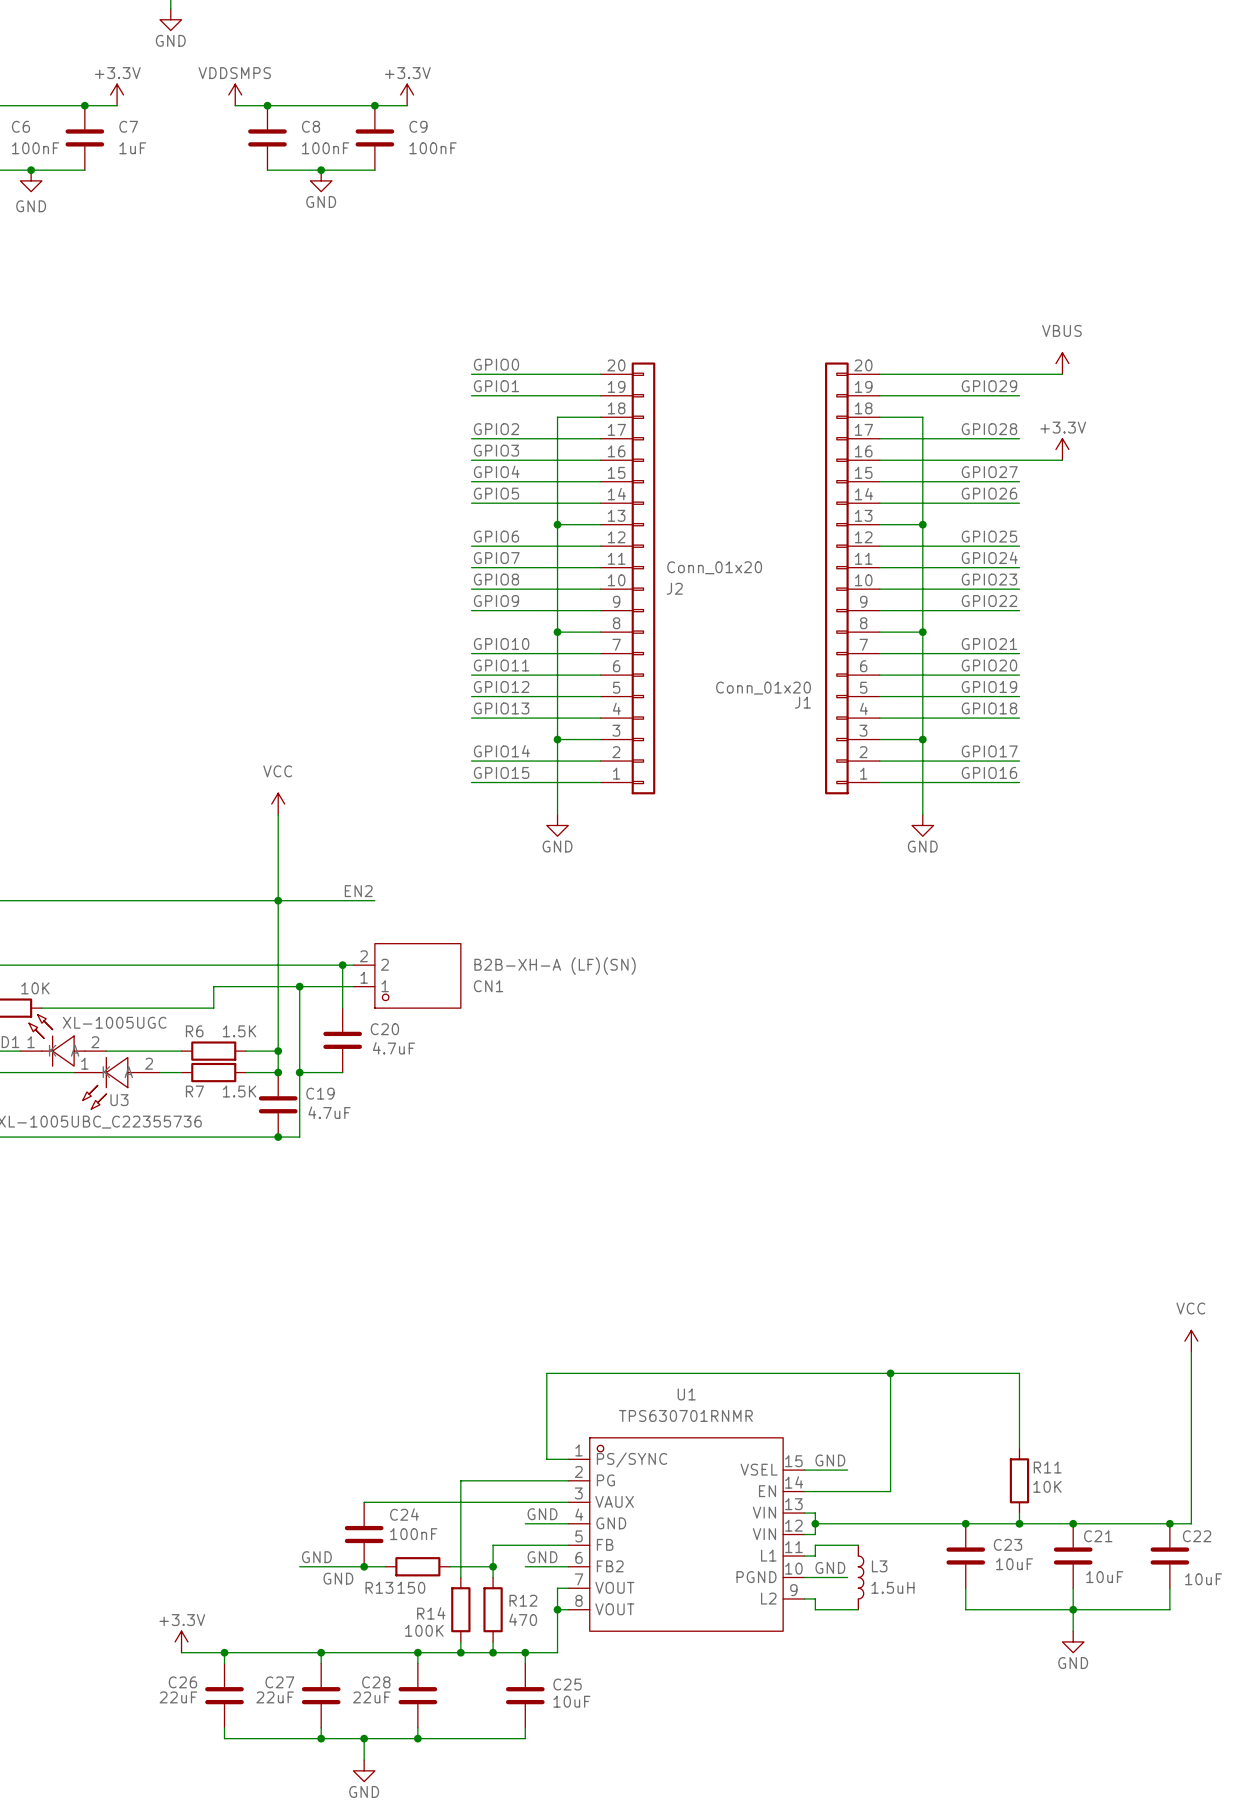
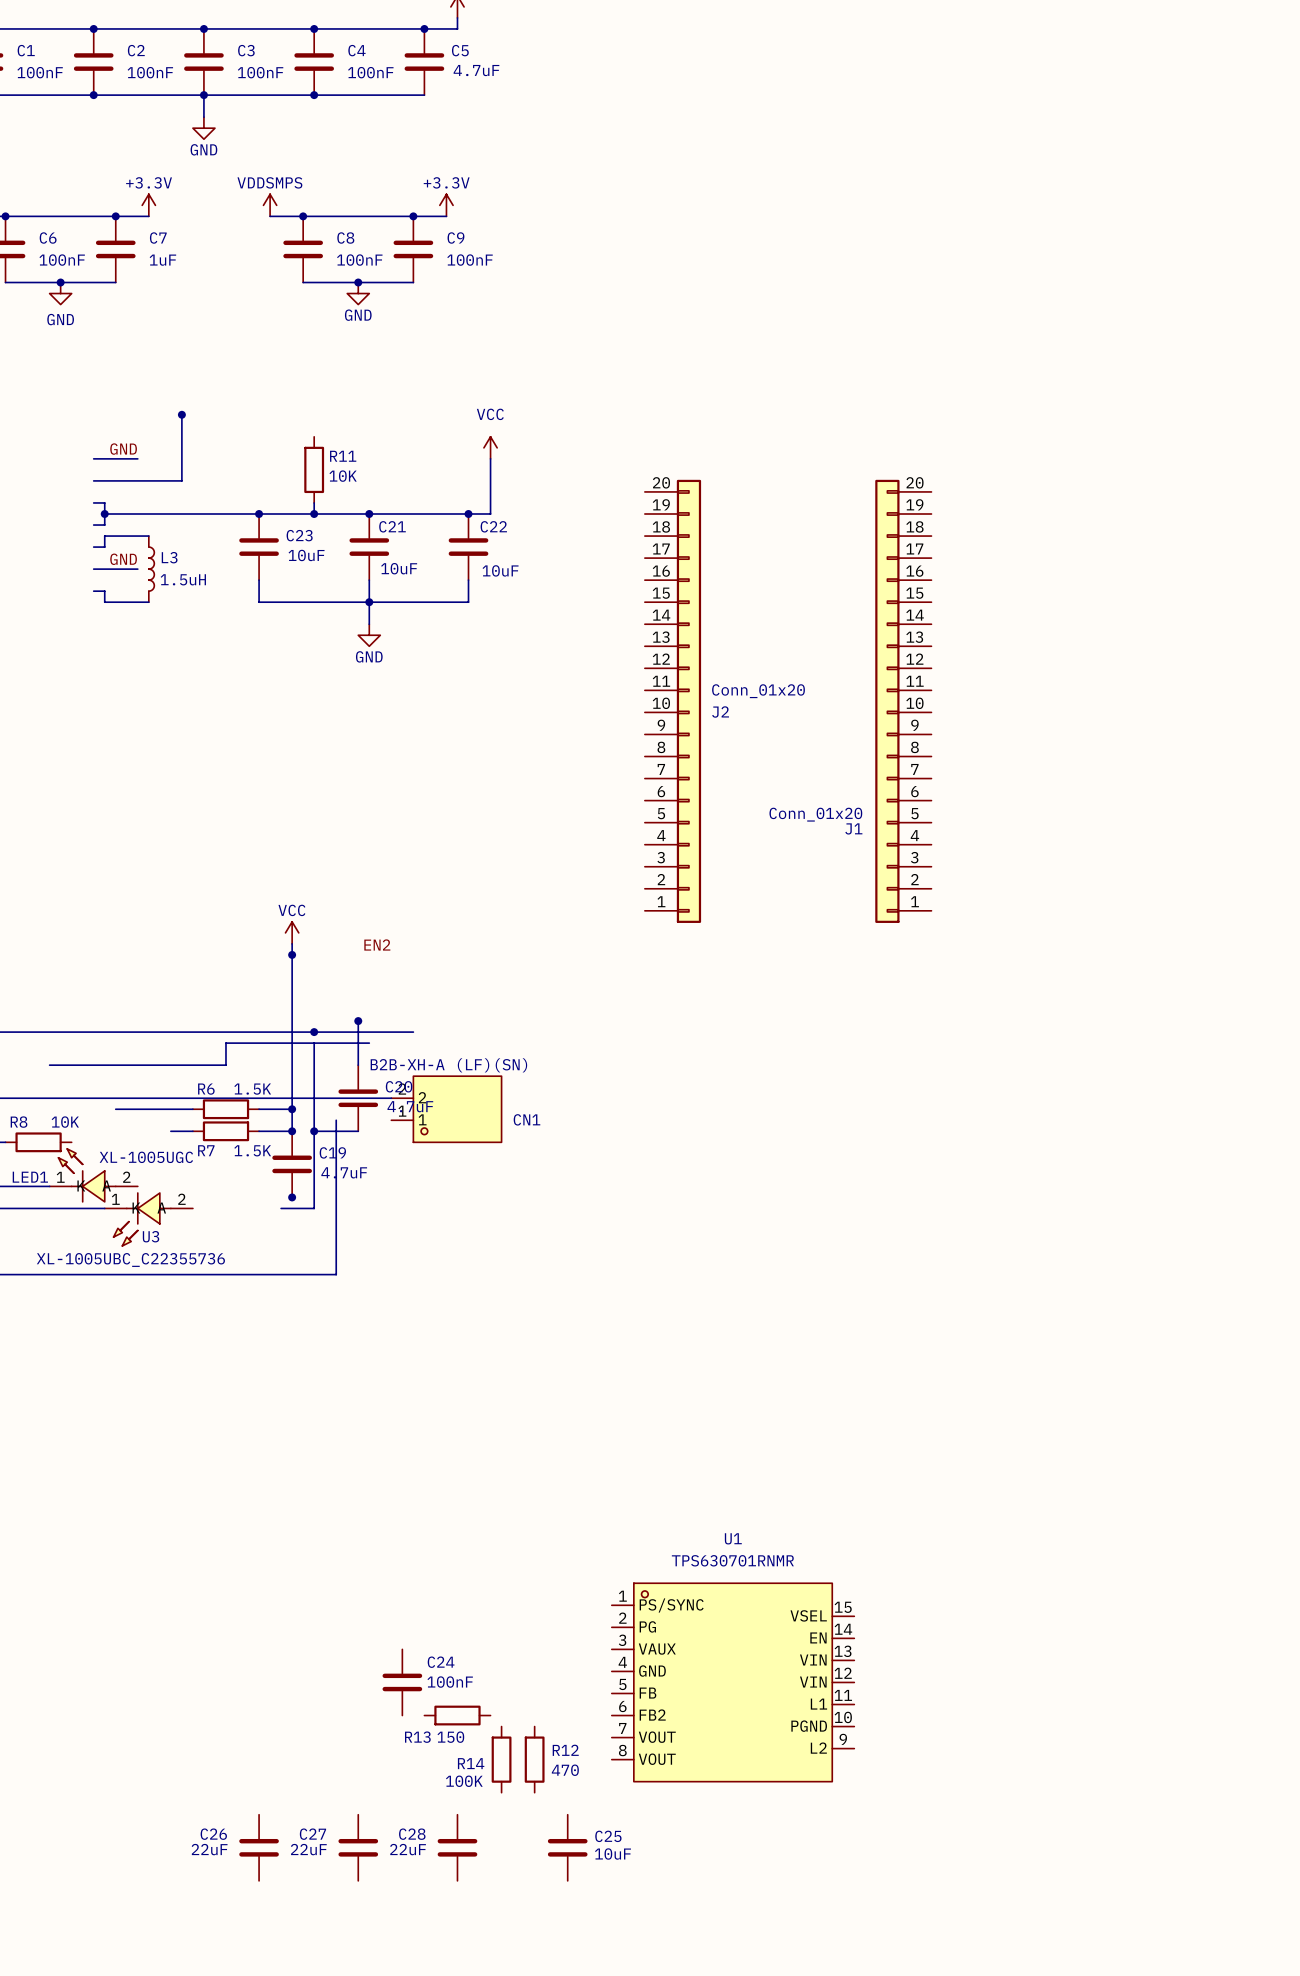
wire: none -> (181, 414) (181, 480) (93, 480)
junction: none -> (181, 414)
power symbol: none -> VCC (490, 447)
label: none -> GND (123, 449)
wire: none -> (93, 458) (137, 458)
wire: none -> (490, 458) (490, 514) (104, 514)
power symbol: VBUS (1062, 363) -> none
label: GPIO0 (496, 364) -> none
wire: (471, 374) (600, 374) -> none
wire: (879, 374) (1062, 374) -> none
wire: none -> (93, 502) (104, 502) (104, 525) (93, 525)
wire: none -> (314, 502) (314, 514)
label: GPIO1 (496, 386) -> none
label: GPIO29 (989, 386) -> none
junction: none -> (104, 514)
junction: none -> (259, 514)
junction: none -> (314, 514)
junction: none -> (369, 514)
junction: none -> (468, 514)
wire: (471, 395) (600, 395) -> none
wire: (879, 395) (1019, 395) -> none
wire: none -> (148, 536) (104, 536) (104, 547) (93, 547)
wire: (600, 417) (557, 417) (557, 814) -> none
wire: (879, 417) (922, 417) (922, 814) -> none
label: GPIO2 (496, 429) -> none
label: GPIO28 (989, 429) -> none
wire: (471, 438) (600, 438) -> none
wire: (879, 438) (1019, 438) -> none
label: none -> GND (123, 559)
wire: none -> (93, 569) (137, 569)
power symbol: +3.3V (1062, 449) -> none
label: GPIO3 (496, 450) -> none
wire: none -> (259, 580) (259, 602) (468, 602) (468, 580)
wire: none -> (369, 580) (369, 624)
wire: (471, 460) (600, 460) -> none
wire: (879, 460) (1062, 460) -> none
wire: none -> (93, 591) (104, 591) (104, 602) (148, 602)
label: GPIO4 (496, 471) -> none
label: GPIO27 (989, 472) -> none
junction: none -> (369, 602)
wire: (471, 481) (600, 481) -> none
wire: (879, 481) (1019, 481) -> none
label: GPIO5 (496, 493) -> none
label: GPIO26 (989, 493) -> none
wire: (471, 503) (600, 503) -> none
wire: (879, 503) (1019, 503) -> none
power symbol: none -> GND (369, 635)
wire: (557, 524) (600, 524) -> none
junction: (557, 524) -> none
wire: (879, 524) (922, 524) -> none
junction: (922, 524) -> none
label: GPIO6 (496, 536) -> none
label: GPIO25 (989, 536) -> none
wire: (471, 546) (600, 546) -> none
wire: (879, 546) (1019, 546) -> none
label: GPIO24 (989, 557) -> none
label: GPIO7 (496, 558) -> none
wire: (471, 567) (600, 567) -> none
wire: (879, 567) (1019, 567) -> none
label: GPIO8 (496, 579) -> none
label: GPIO23 (989, 579) -> none
wire: (471, 589) (600, 589) -> none
wire: (879, 589) (1019, 589) -> none
label: GPIO9 (496, 601) -> none
label: GPIO22 (989, 601) -> none
wire: (471, 610) (600, 610) -> none
wire: (879, 610) (1019, 610) -> none
wire: (557, 632) (600, 632) -> none
junction: (557, 632) -> none
wire: (879, 632) (922, 632) -> none
junction: (922, 632) -> none
label: GPIO10 (501, 644) -> none
label: GPIO21 (989, 644) -> none
wire: (471, 653) (600, 653) -> none
wire: (879, 653) (1019, 653) -> none
label: GPIO11 (501, 665) -> none
label: GPIO20 (989, 665) -> none
wire: (471, 675) (600, 675) -> none
wire: (879, 675) (1019, 675) -> none
label: GPIO12 (501, 686) -> none
label: GPIO19 (989, 686) -> none
wire: (471, 696) (600, 696) -> none
wire: (879, 696) (1019, 696) -> none
label: GPIO13 (501, 708) -> none
label: GPIO18 (989, 708) -> none
wire: (471, 718) (600, 718) -> none
wire: (879, 718) (1019, 718) -> none
wire: (557, 739) (600, 739) -> none
junction: (557, 739) -> none
wire: (879, 739) (922, 739) -> none
junction: (922, 739) -> none
label: GPIO14 (501, 751) -> none
label: GPIO17 (989, 751) -> none
wire: (471, 761) (600, 761) -> none
wire: (879, 761) (1019, 761) -> none
power symbol text position: VCC (277, 771) -> VCC (291, 910)
label: GPIO15 (501, 772) -> none
label: GPIO16 (989, 772) -> none
wire: (471, 782) (600, 782) -> none
wire: (879, 782) (1019, 782) -> none
power symbol position: VCC (278, 804) -> VCC (292, 932)
wire: none -> (292, 943) (292, 1131) (259, 1131)
wire: (278, 814) (278, 911) -> none
junction: none -> (292, 954)
power symbol: GND (557, 825) -> none
power symbol: GND (922, 825) -> none
junction: none -> (358, 1021)
label position: EN2 (358, 891) -> EN2 (377, 944)
wire: (342, 965) (342, 1008) -> (358, 1021) (358, 1065)
junction: (342, 965) -> none
CN1 value position: B2B-XH-A (LF)(SN) (555, 966) -> B2B-XH-A (LF)(SN) (448, 1065)
junction: none -> (292, 1109)
junction: (299, 986) -> none
wire: (353, 986) (213, 986) (213, 1008) (41, 1008) -> (369, 1043) (225, 1043) (225, 1065) (49, 1065)
junction: none -> (292, 1131)
junction: none -> (314, 1131)
C20 position: (342, 1040) -> (358, 1098)
wire: (106, 1051) (181, 1051) -> (115, 1109) (192, 1109)
R6 position: (213, 1051) -> (225, 1109)
wire: (245, 1051) (278, 1051) -> (259, 1109) (292, 1109)
junction: (278, 1051) -> none
junction: none -> (292, 1197)
wire: (160, 1072) (181, 1072) -> (170, 1131) (192, 1131)
R7 position: (213, 1072) -> (225, 1131)
junction: (278, 1072) -> none
wire: (299, 1072) (342, 1072) -> (314, 1131) (358, 1131)
junction: (299, 1072) -> none
C19 position: (278, 1104) -> (292, 1164)
junction: (278, 1137) -> none
power symbol: VCC (1191, 1341) -> none
wire: (1191, 1351) (1191, 1523) (815, 1523) -> none
wire: (890, 1373) (890, 1491) (804, 1491) -> none
junction: (890, 1373) -> none
wire: (1019, 1448) (1019, 1373) (546, 1373) (546, 1459) (568, 1459) -> none
label: GND (830, 1460) -> none
wire: (804, 1470) (847, 1470) -> none
wire: (568, 1480) (460, 1480) (460, 1577) -> none
R11 position: (1019, 1480) -> (314, 469)
wire: (364, 1502) (568, 1502) -> none
wire: (804, 1513) (815, 1513) (815, 1534) (804, 1534) -> none
wire: (1019, 1513) (1019, 1523) -> none
label: GND (542, 1514) -> none
wire: (525, 1523) (568, 1523) -> none
junction: (815, 1523) -> none
junction: (965, 1523) -> none
junction: (1019, 1523) -> none
junction: (1073, 1523) -> none
junction: (1169, 1523) -> none
wire: (568, 1545) (493, 1545) (493, 1577) -> none
wire: (858, 1545) (815, 1545) (815, 1556) (804, 1556) -> none
C23 position: (965, 1556) -> (259, 547)
C21 position: (1073, 1556) -> (369, 547)
C22 position: (1169, 1556) -> (468, 547)
label: GND (316, 1557) -> none
label: GND (542, 1557) -> none
wire: (299, 1566) (385, 1566) -> none
junction: (364, 1566) -> none
wire: (450, 1566) (493, 1566) -> none
junction: (493, 1566) -> none
wire: (525, 1566) (568, 1566) -> none
label: GND (830, 1567) -> none
wire: (804, 1577) (847, 1577) -> none
L3 position: (861, 1577) -> (151, 569)
label: GND (338, 1578) -> none
wire: (568, 1588) (557, 1588) (557, 1652) (181, 1652) -> none
wire: (965, 1588) (965, 1609) (1169, 1609) (1169, 1588) -> none
wire: (1073, 1588) (1073, 1631) -> none
wire: (804, 1598) (815, 1598) (815, 1609) (858, 1609) -> none
wire: (557, 1609) (568, 1609) -> none
junction: (557, 1609) -> none
junction: (1073, 1609) -> none
power symbol: +3.3V (181, 1641) -> none
wire: (460, 1641) (460, 1652) -> none
wire: (493, 1641) (493, 1652) -> none
power symbol: GND (1073, 1641) -> none
wire: (224, 1652) (224, 1663) -> none
junction: (224, 1652) -> none
wire: (321, 1652) (321, 1663) -> none
junction: (321, 1652) -> none
wire: (417, 1652) (417, 1663) -> none
junction: (417, 1652) -> none
junction: (460, 1652) -> none
junction: (493, 1652) -> none
wire: (525, 1652) (525, 1663) -> none
junction: (525, 1652) -> none
wire: (224, 1727) (224, 1738) (525, 1738) (525, 1727) -> none
wire: (321, 1727) (321, 1738) -> none
wire: (417, 1727) (417, 1738) -> none
junction: (321, 1738) -> none
wire: (364, 1738) (364, 1760) -> none
junction: (364, 1738) -> none
junction: (417, 1738) -> none
power symbol: GND (364, 1770) -> none

